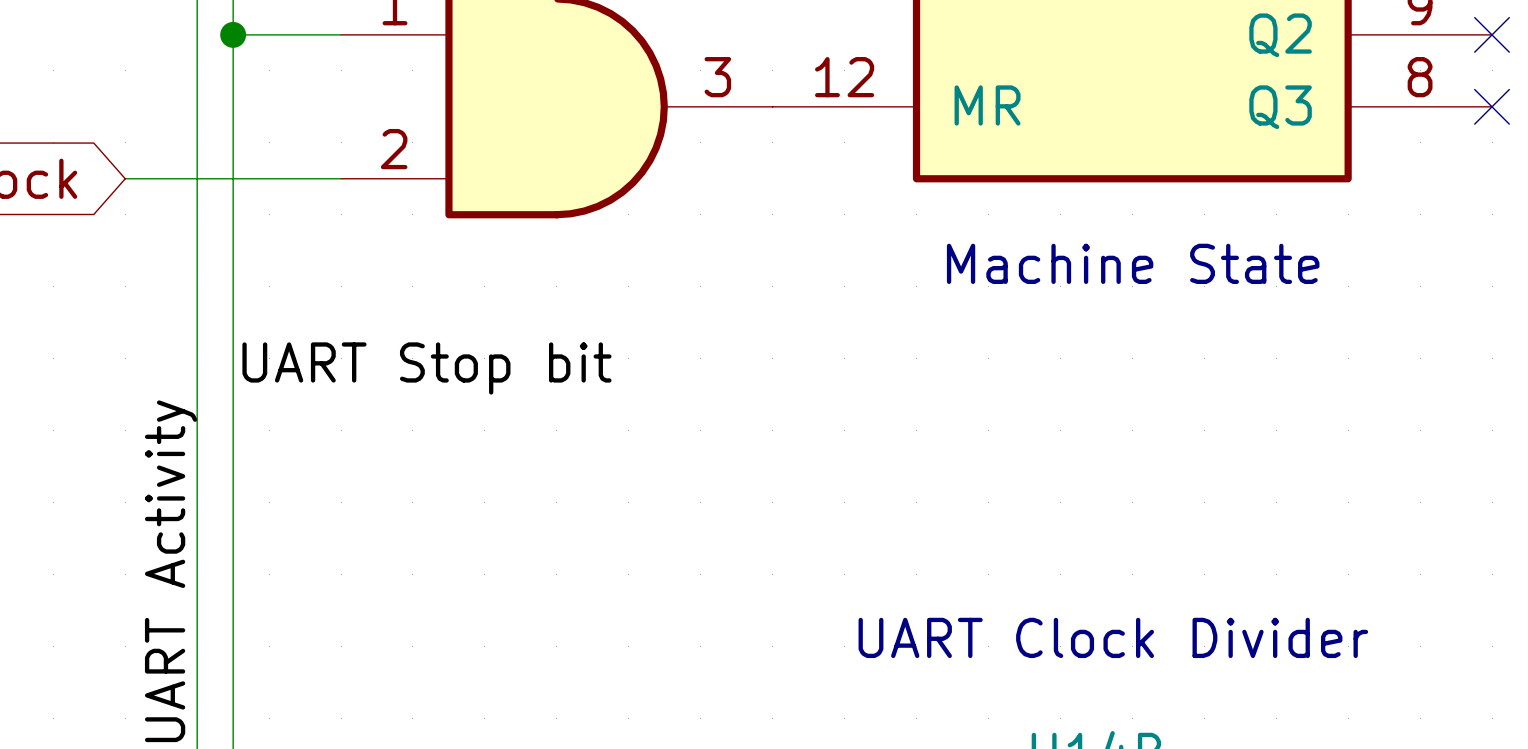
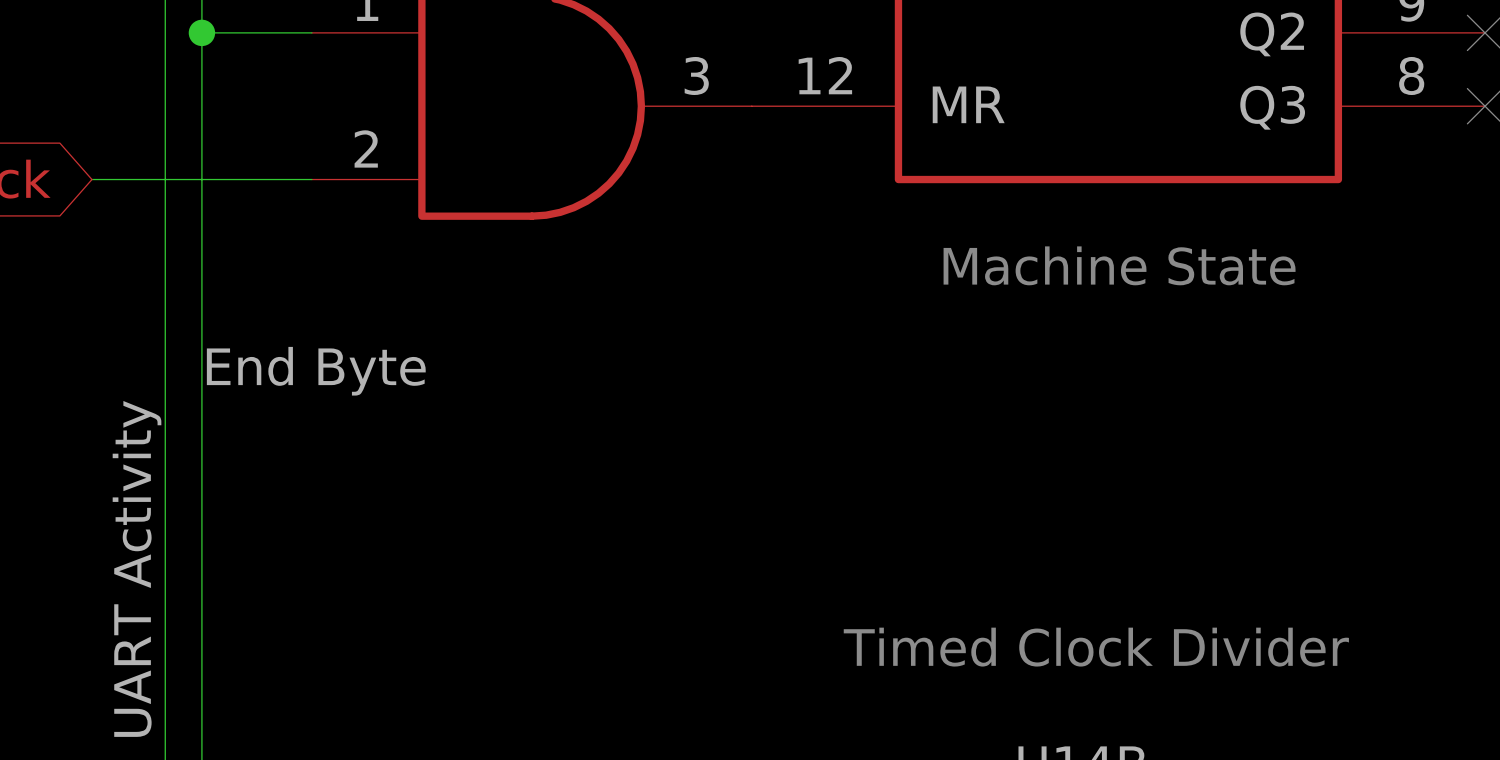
label: UART Stop bit (426, 368) -> End Byte (316, 371)
text: UART Clock Divider (1113, 637) -> Timed Clock Divider (1096, 647)

